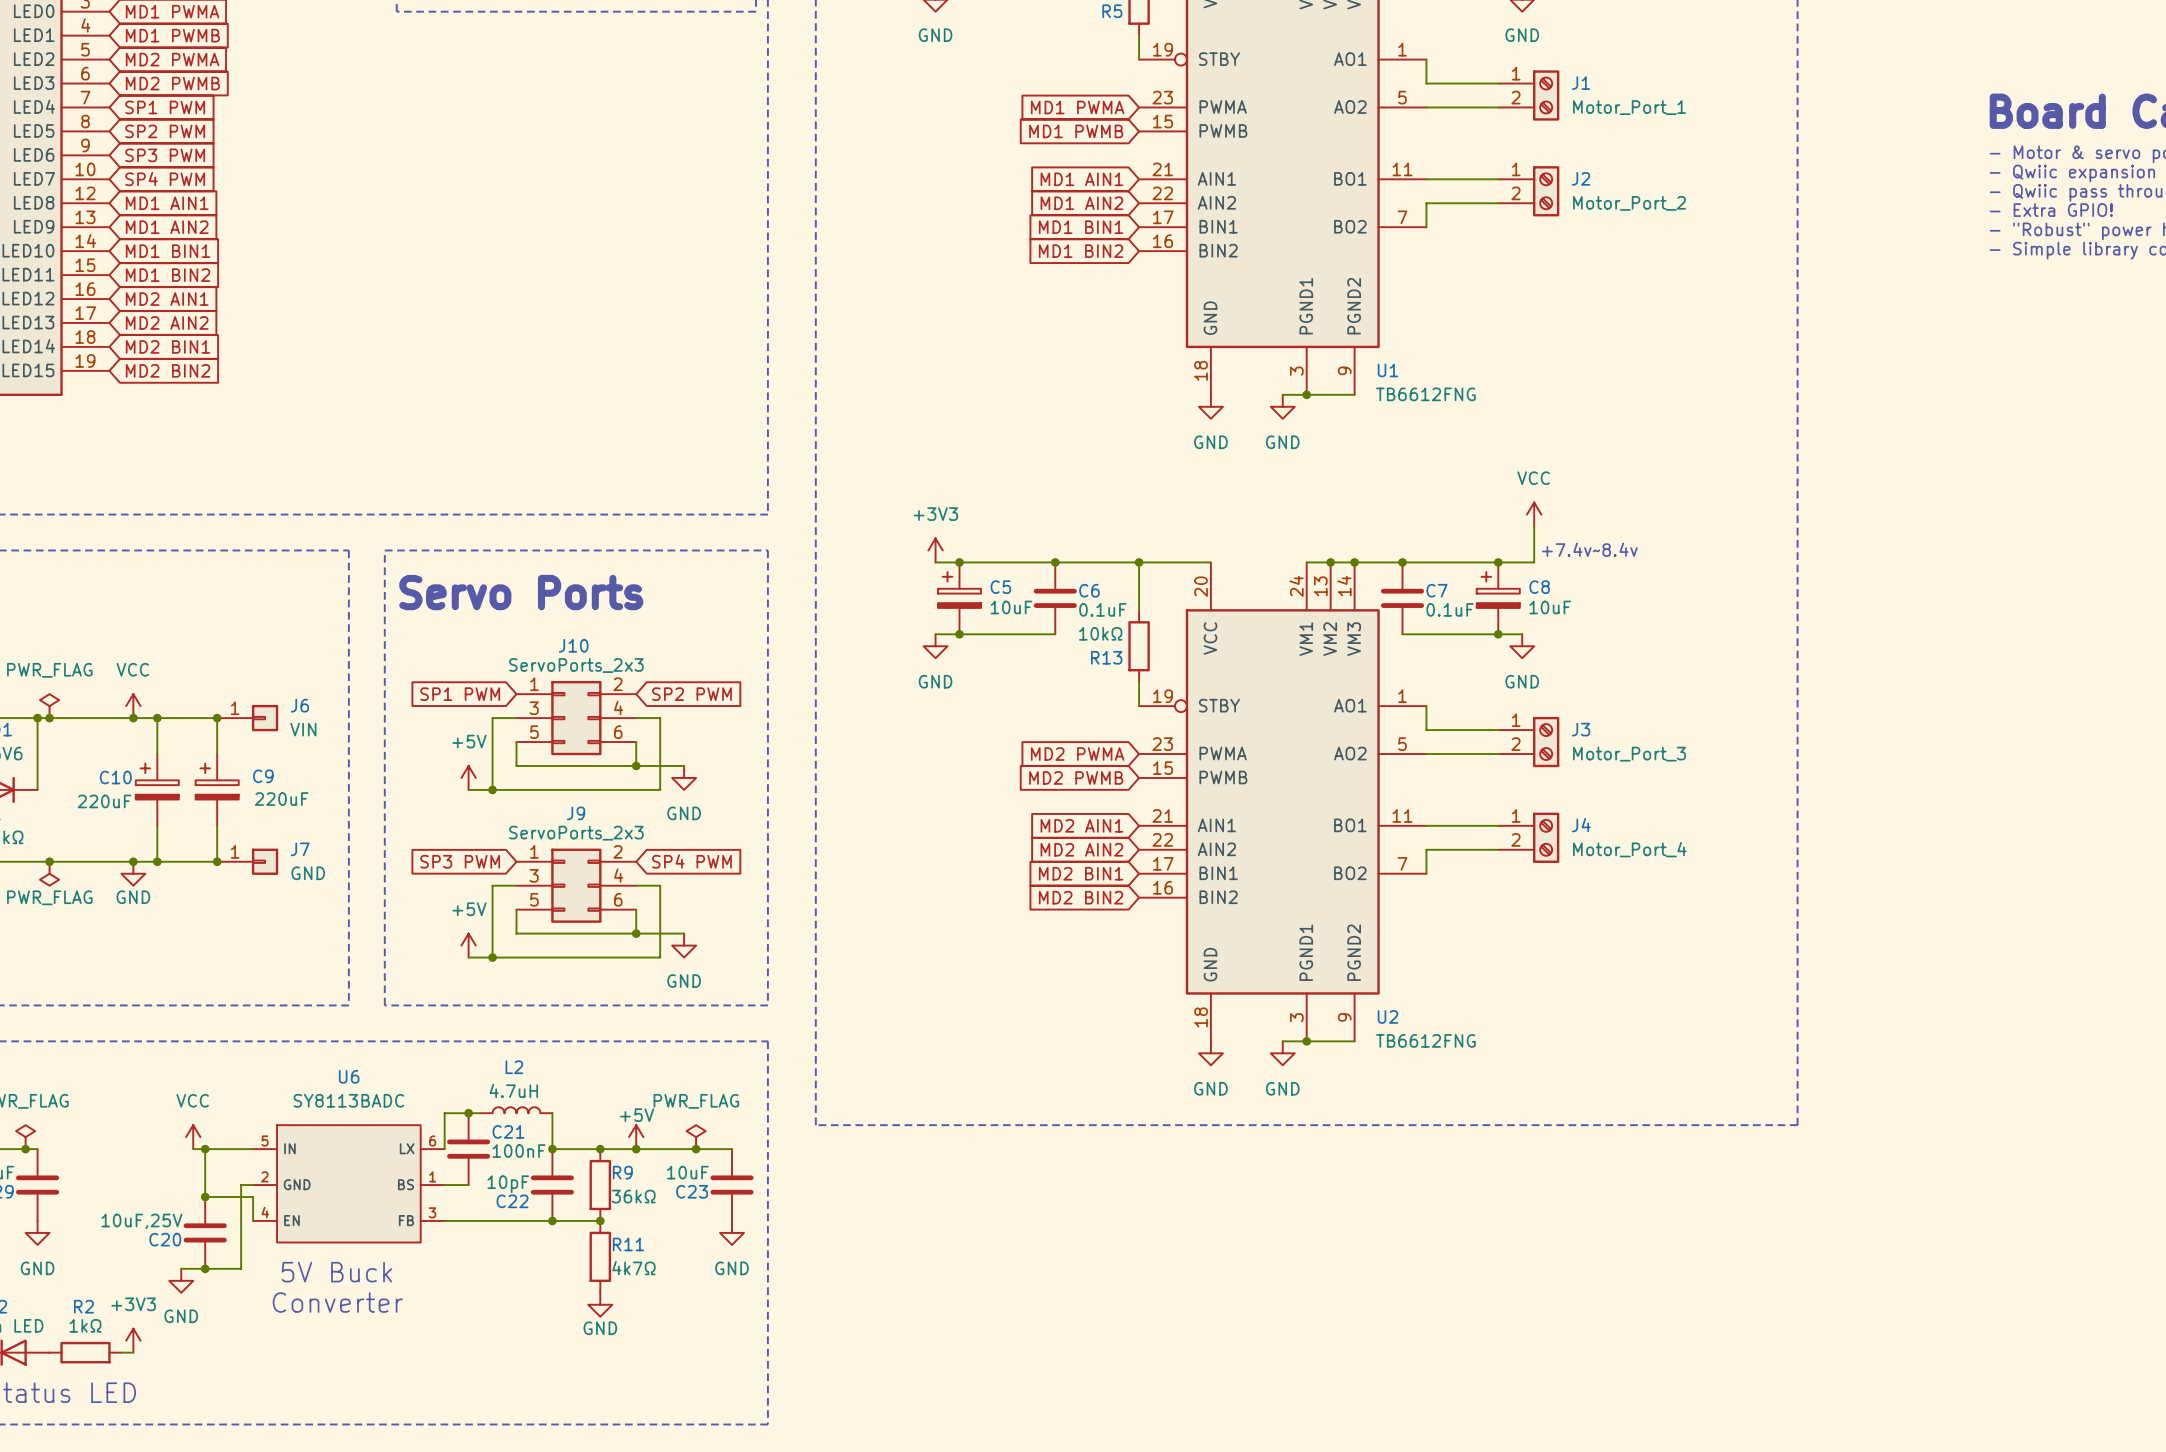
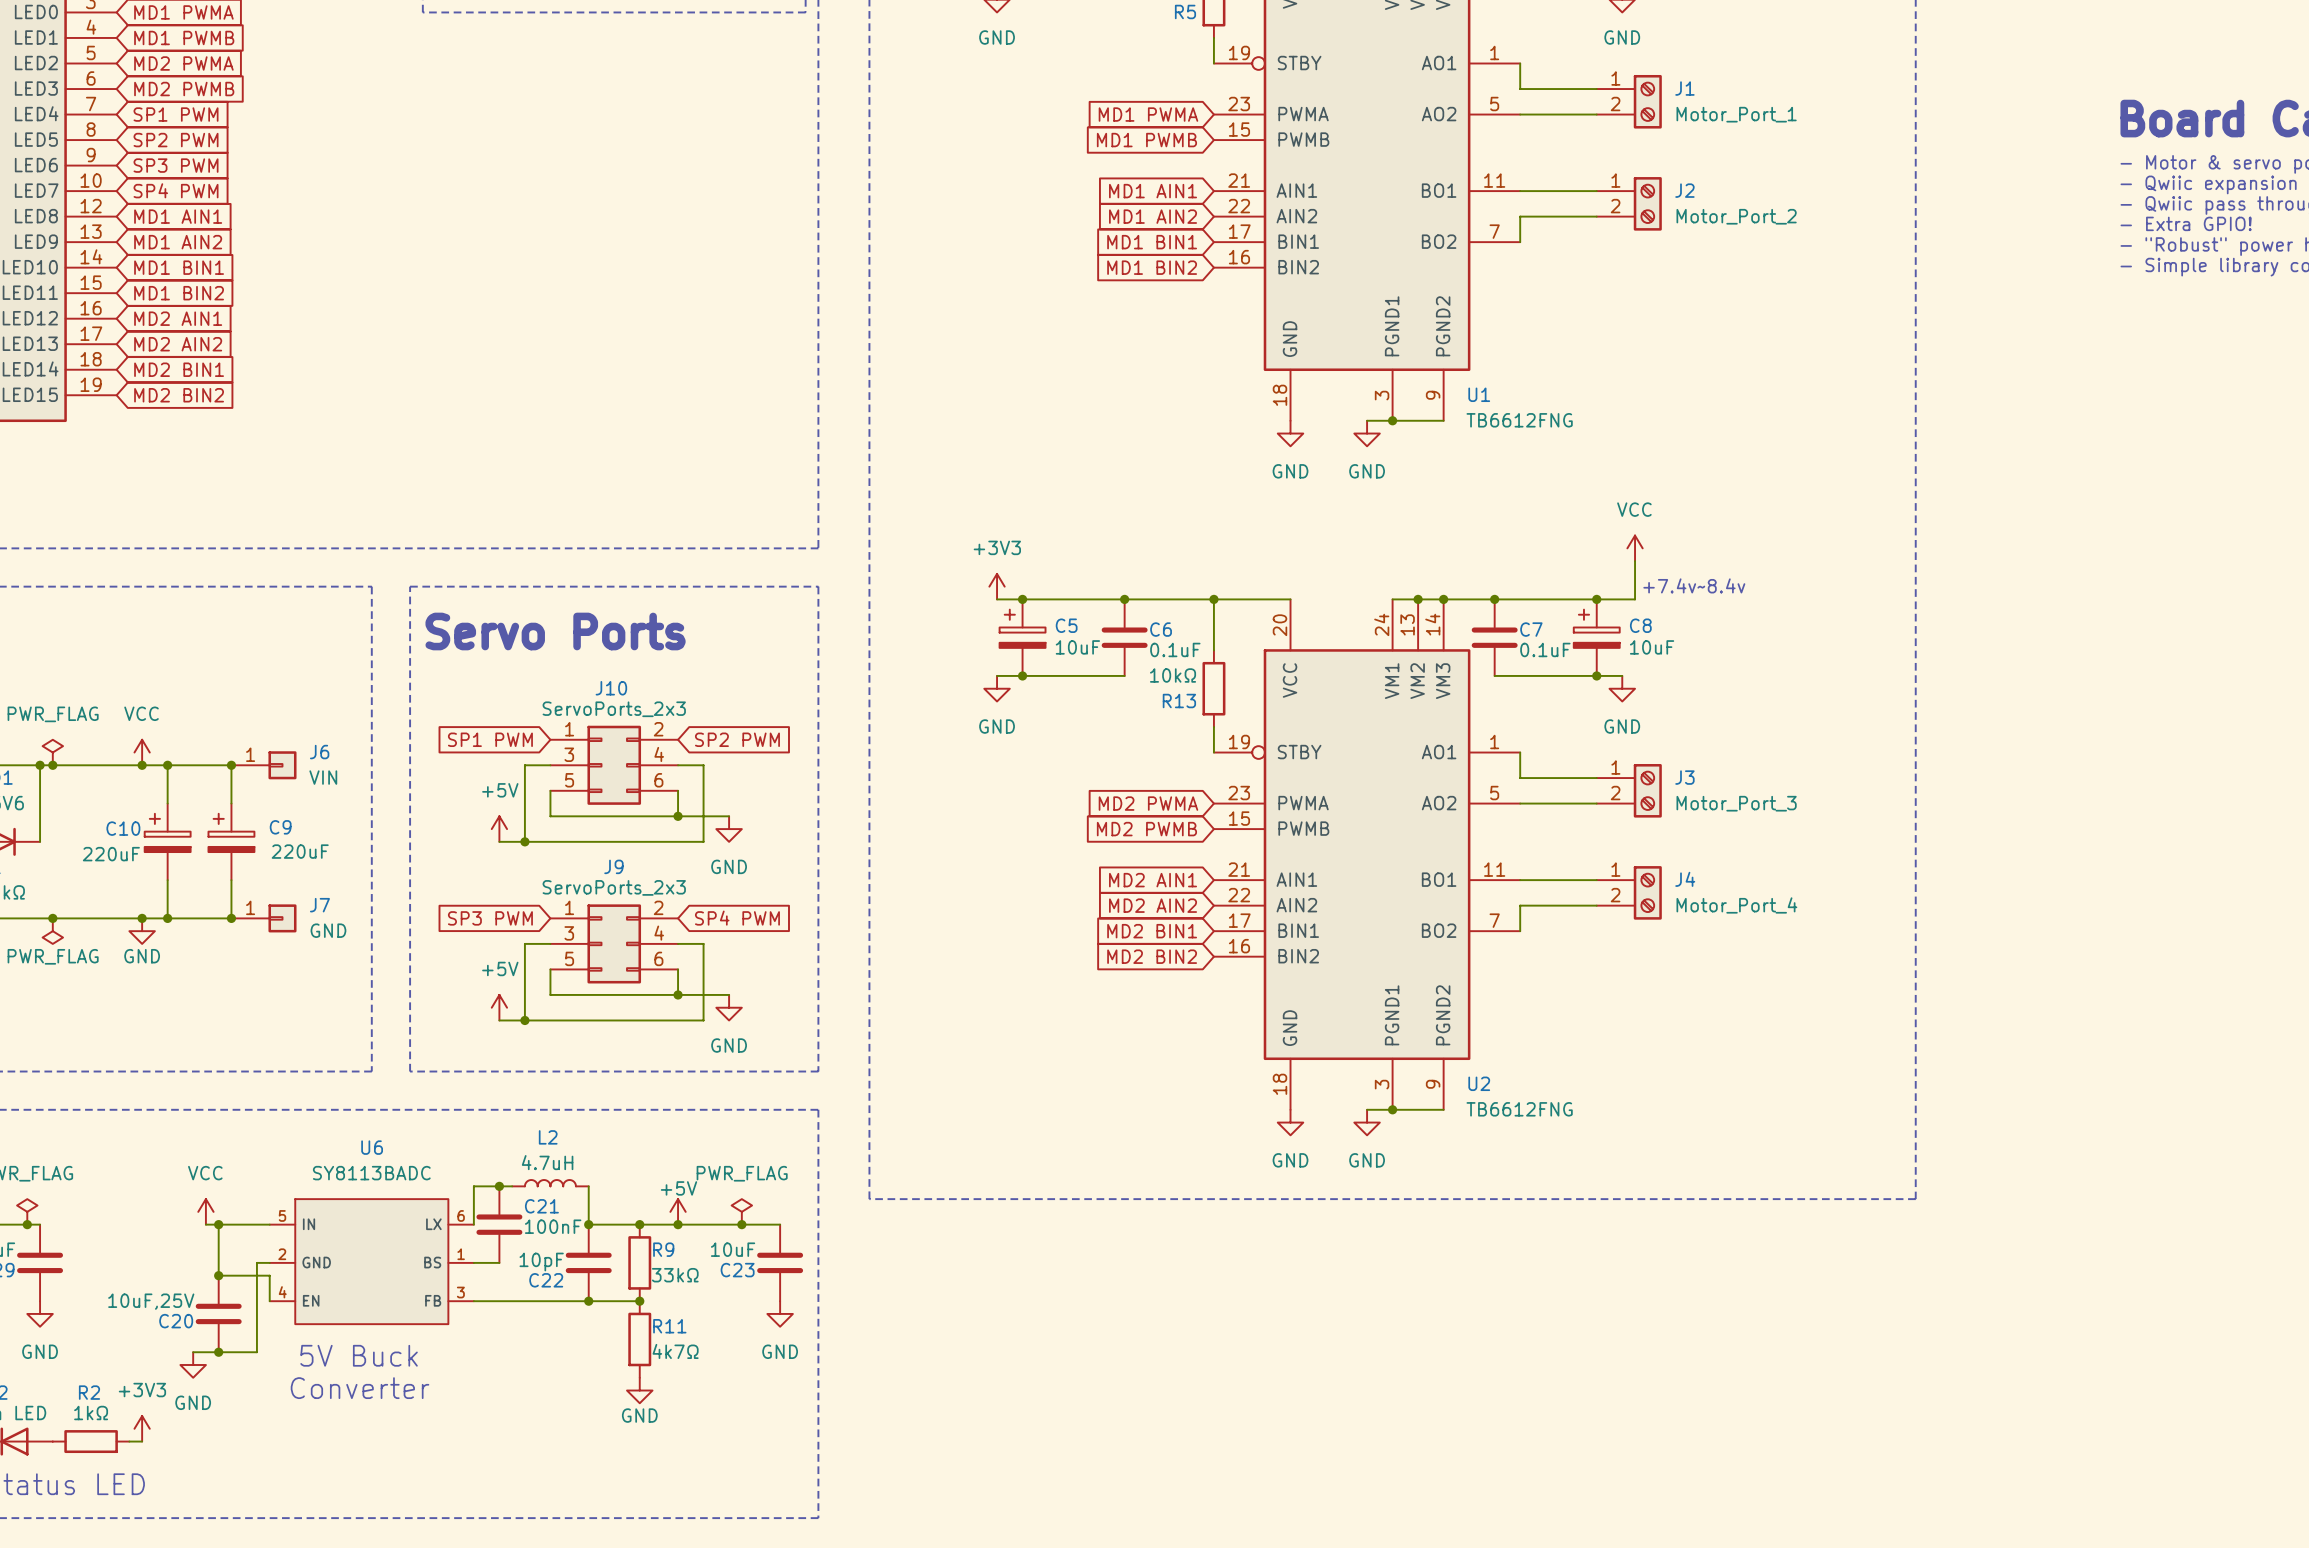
R9 value: 36kΩ (633, 1196) -> 33kΩ (675, 1275)

